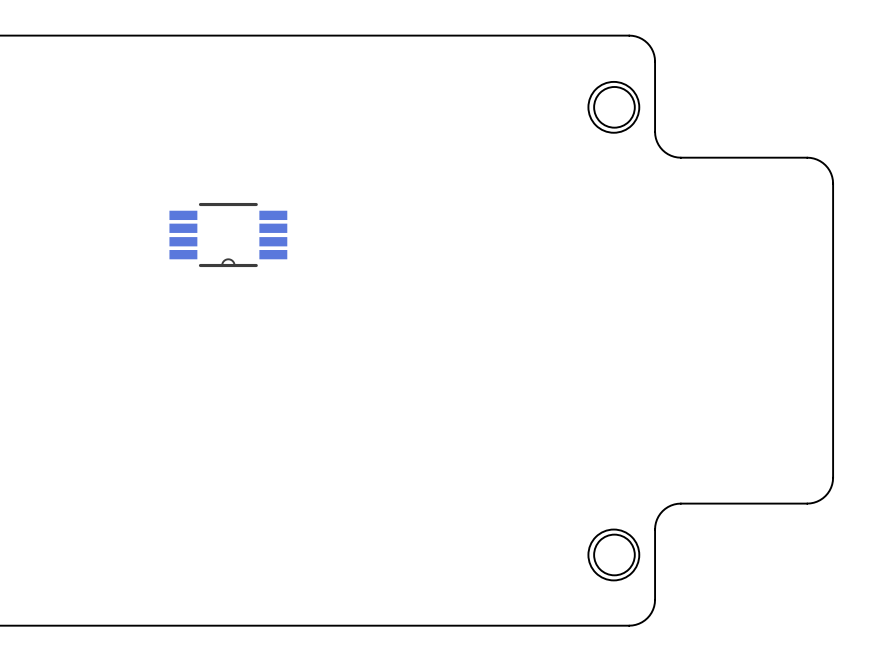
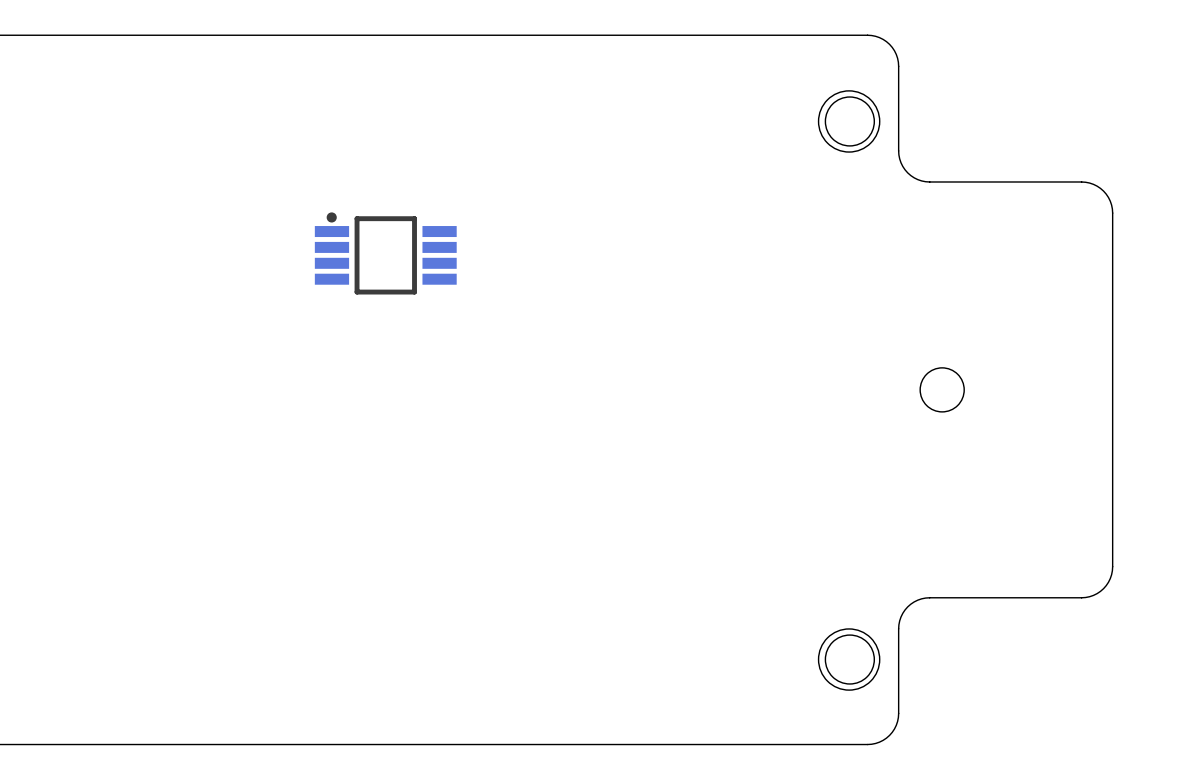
part footprint: [169, 202, 288, 268] -> [314, 212, 457, 295]
round board edge: none -> [920, 367, 965, 412]

